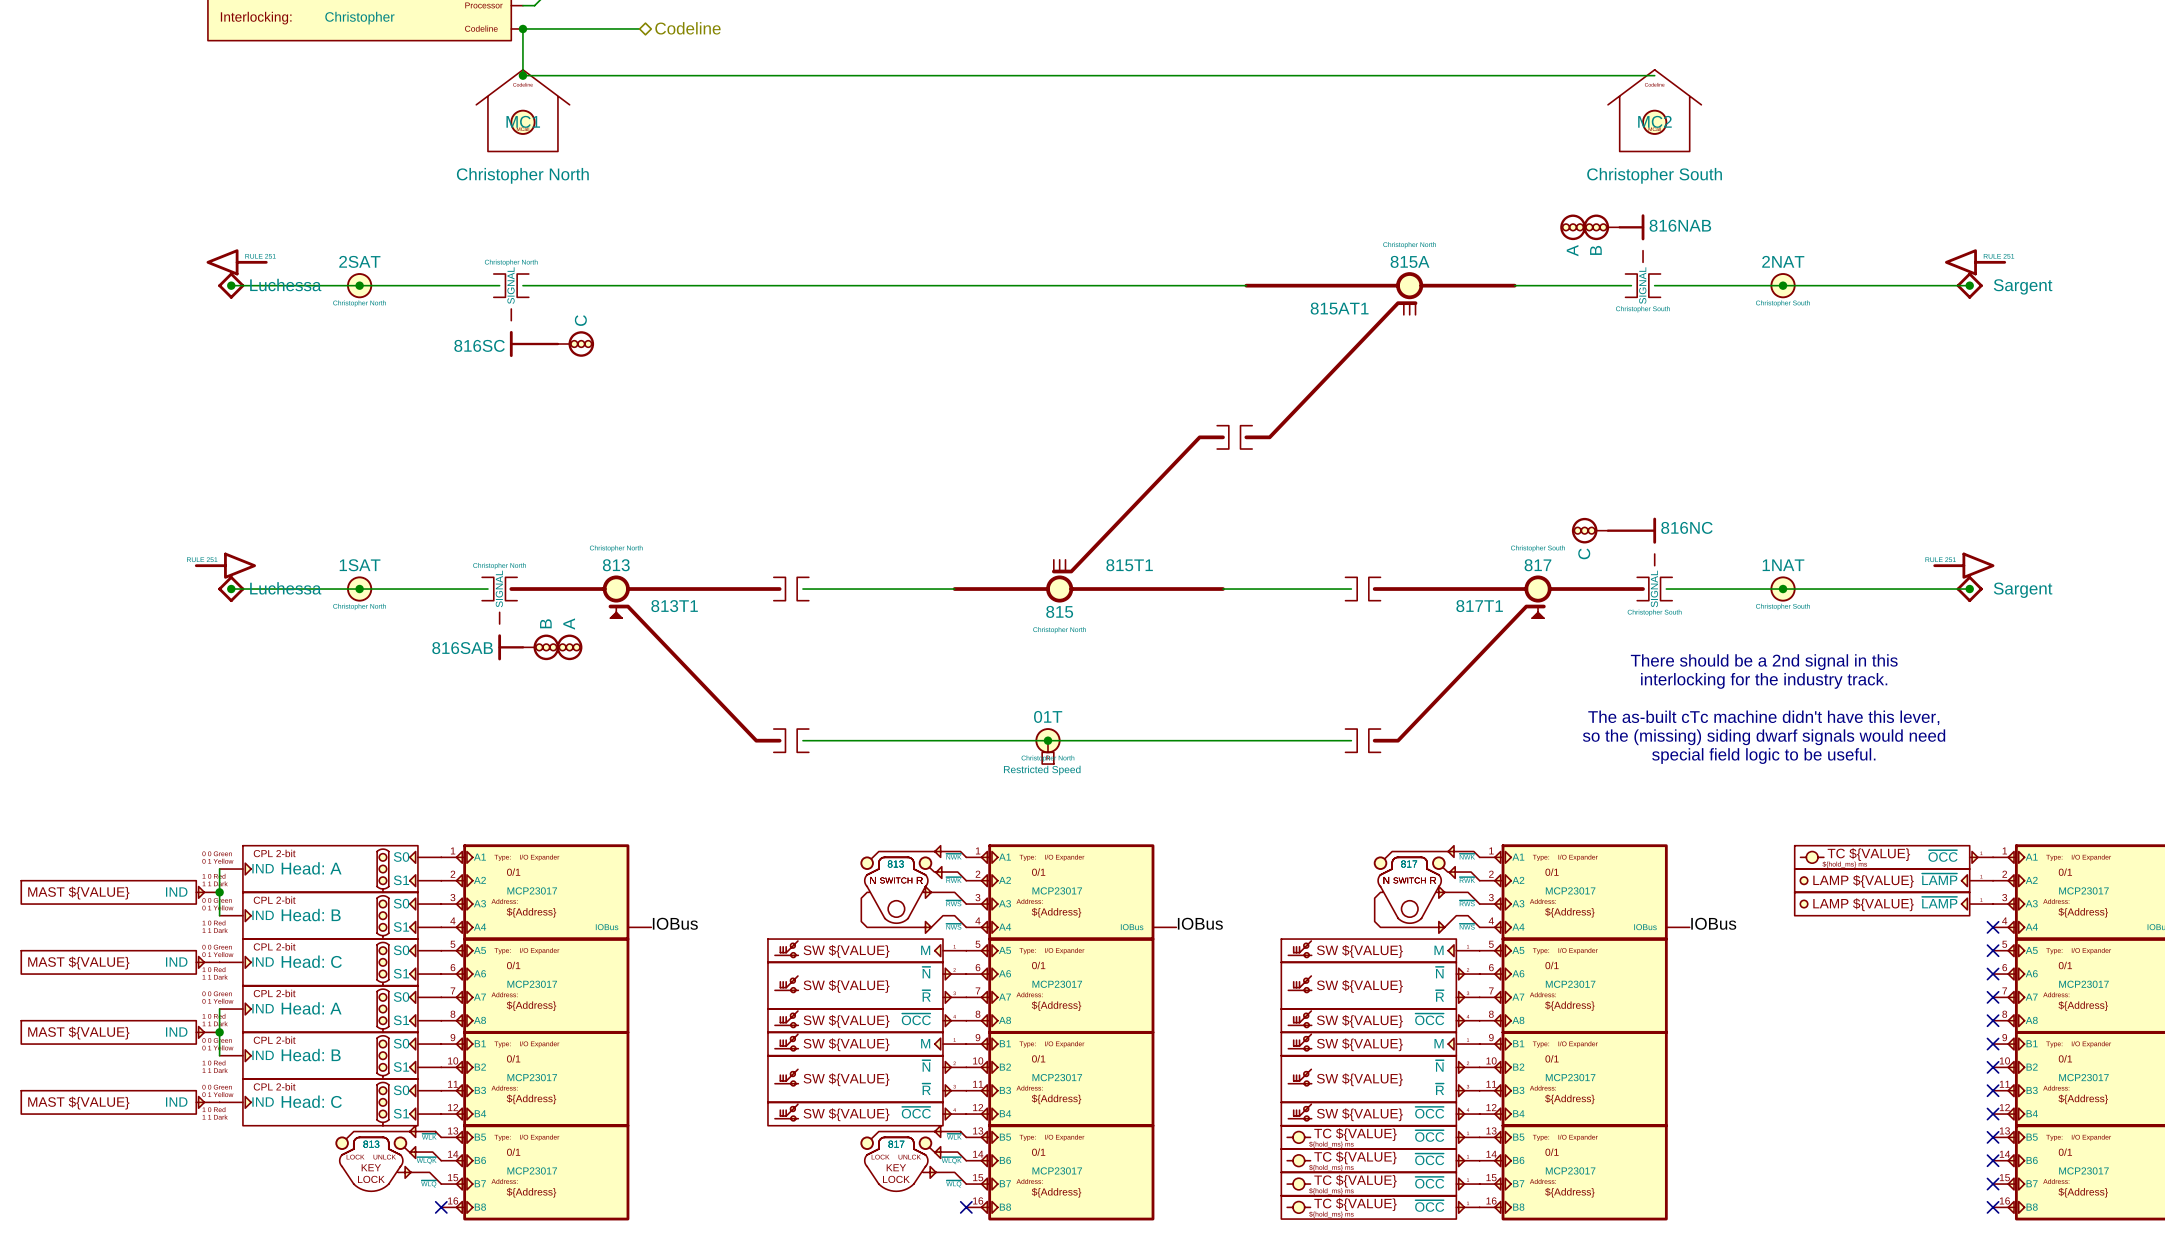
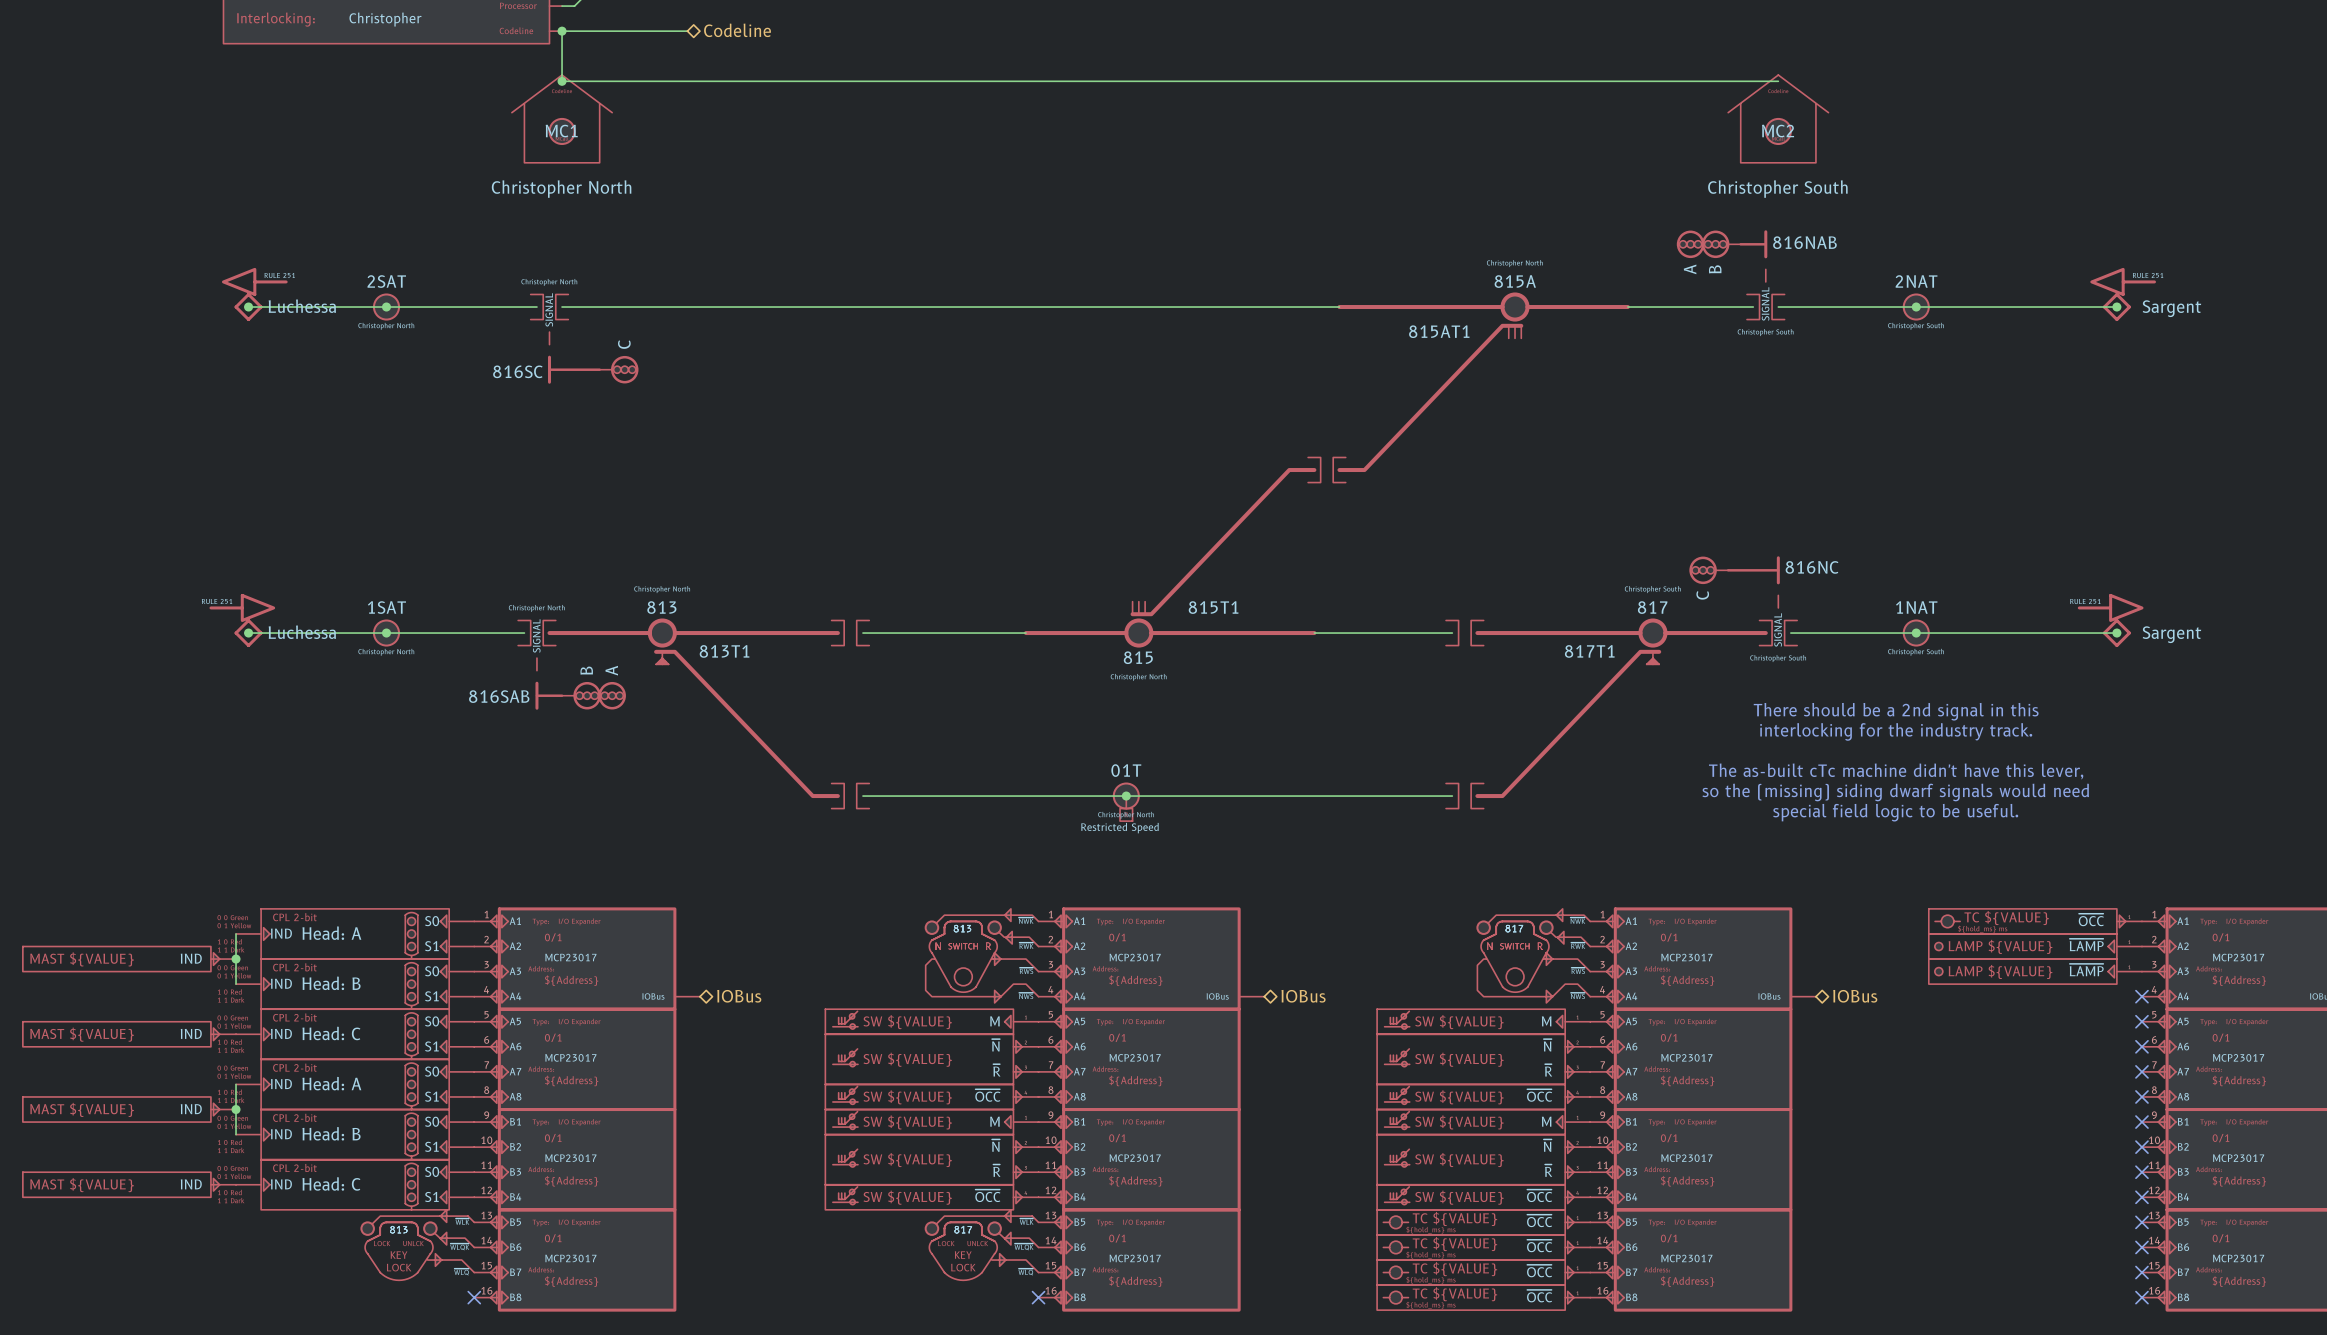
label: IOBus (675, 923) -> none
label: IOBus (1200, 923) -> none
label: IOBus (1713, 923) -> none
hierarchical label: none -> IOBus (739, 996)
hierarchical label: none -> IOBus (1303, 996)
hierarchical label: none -> IOBus (1855, 996)

